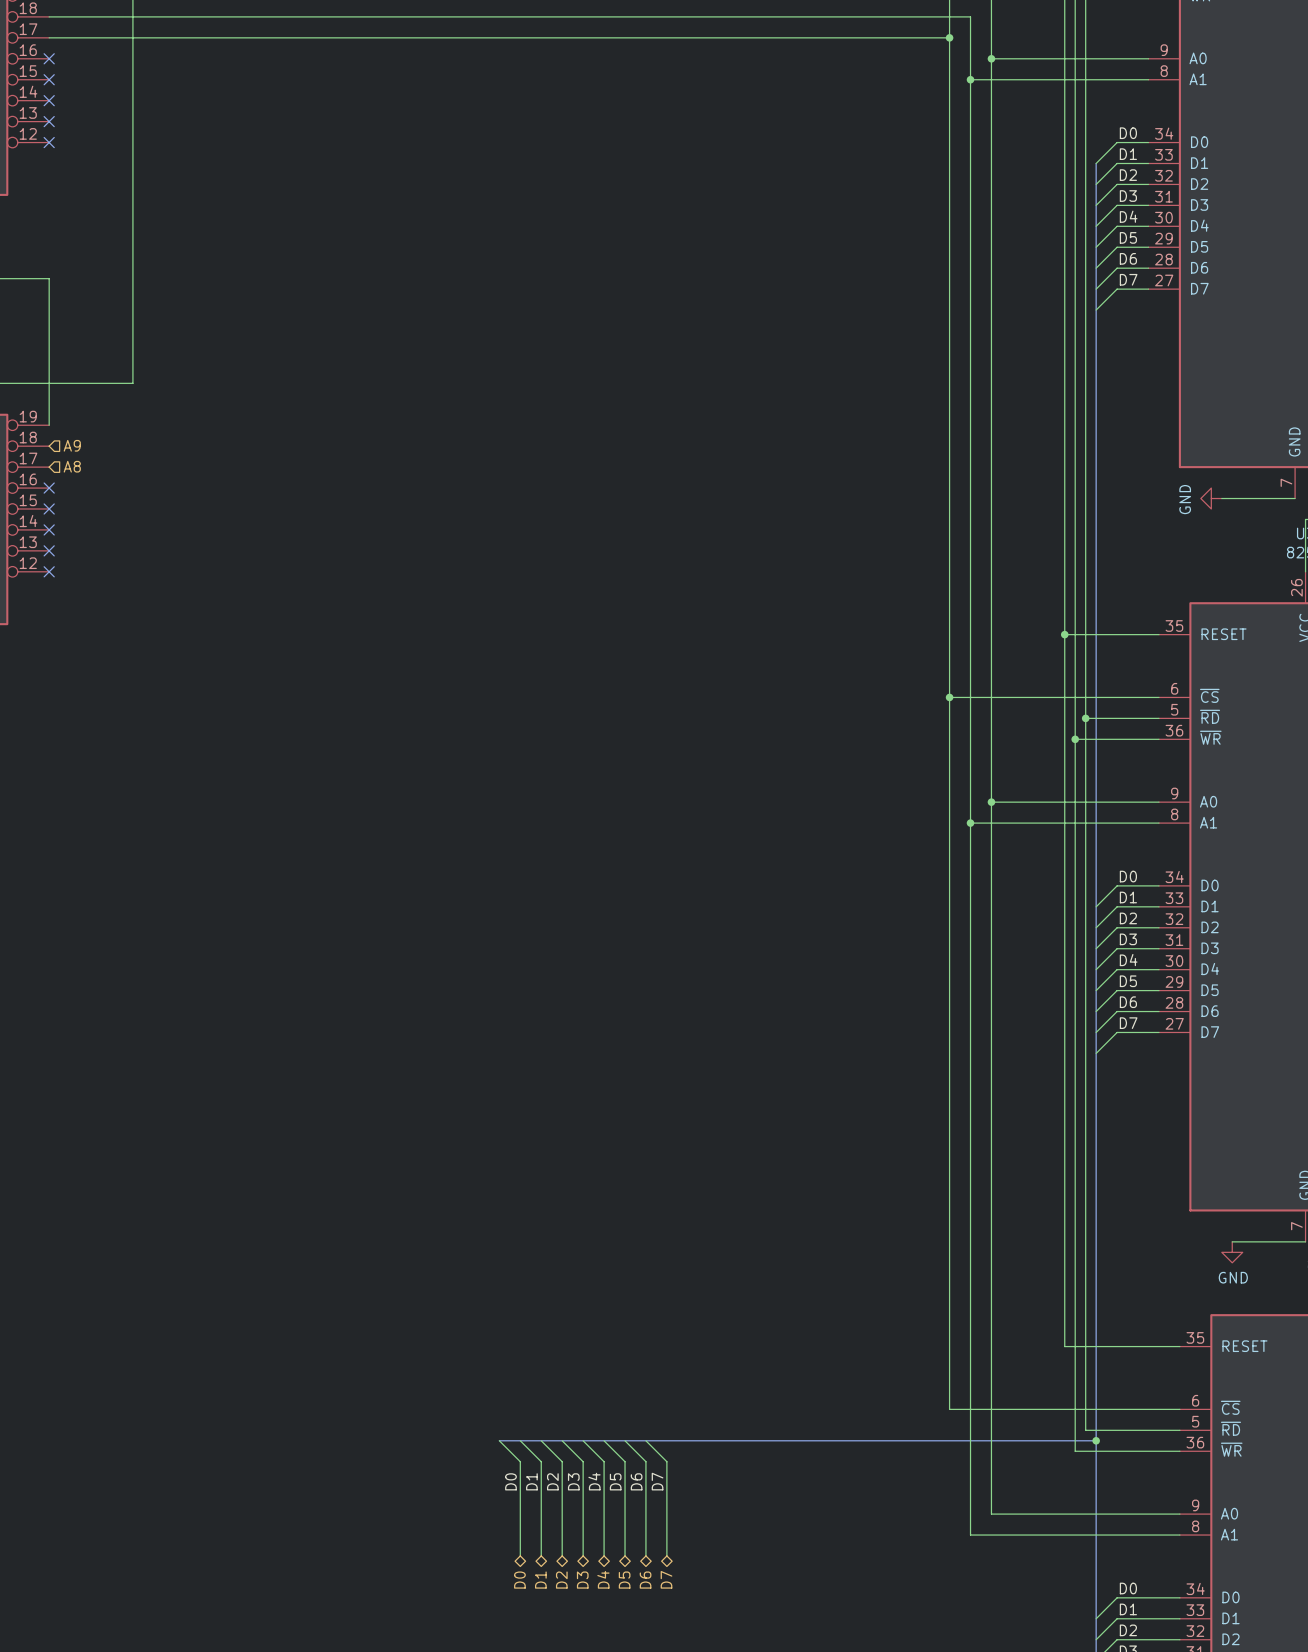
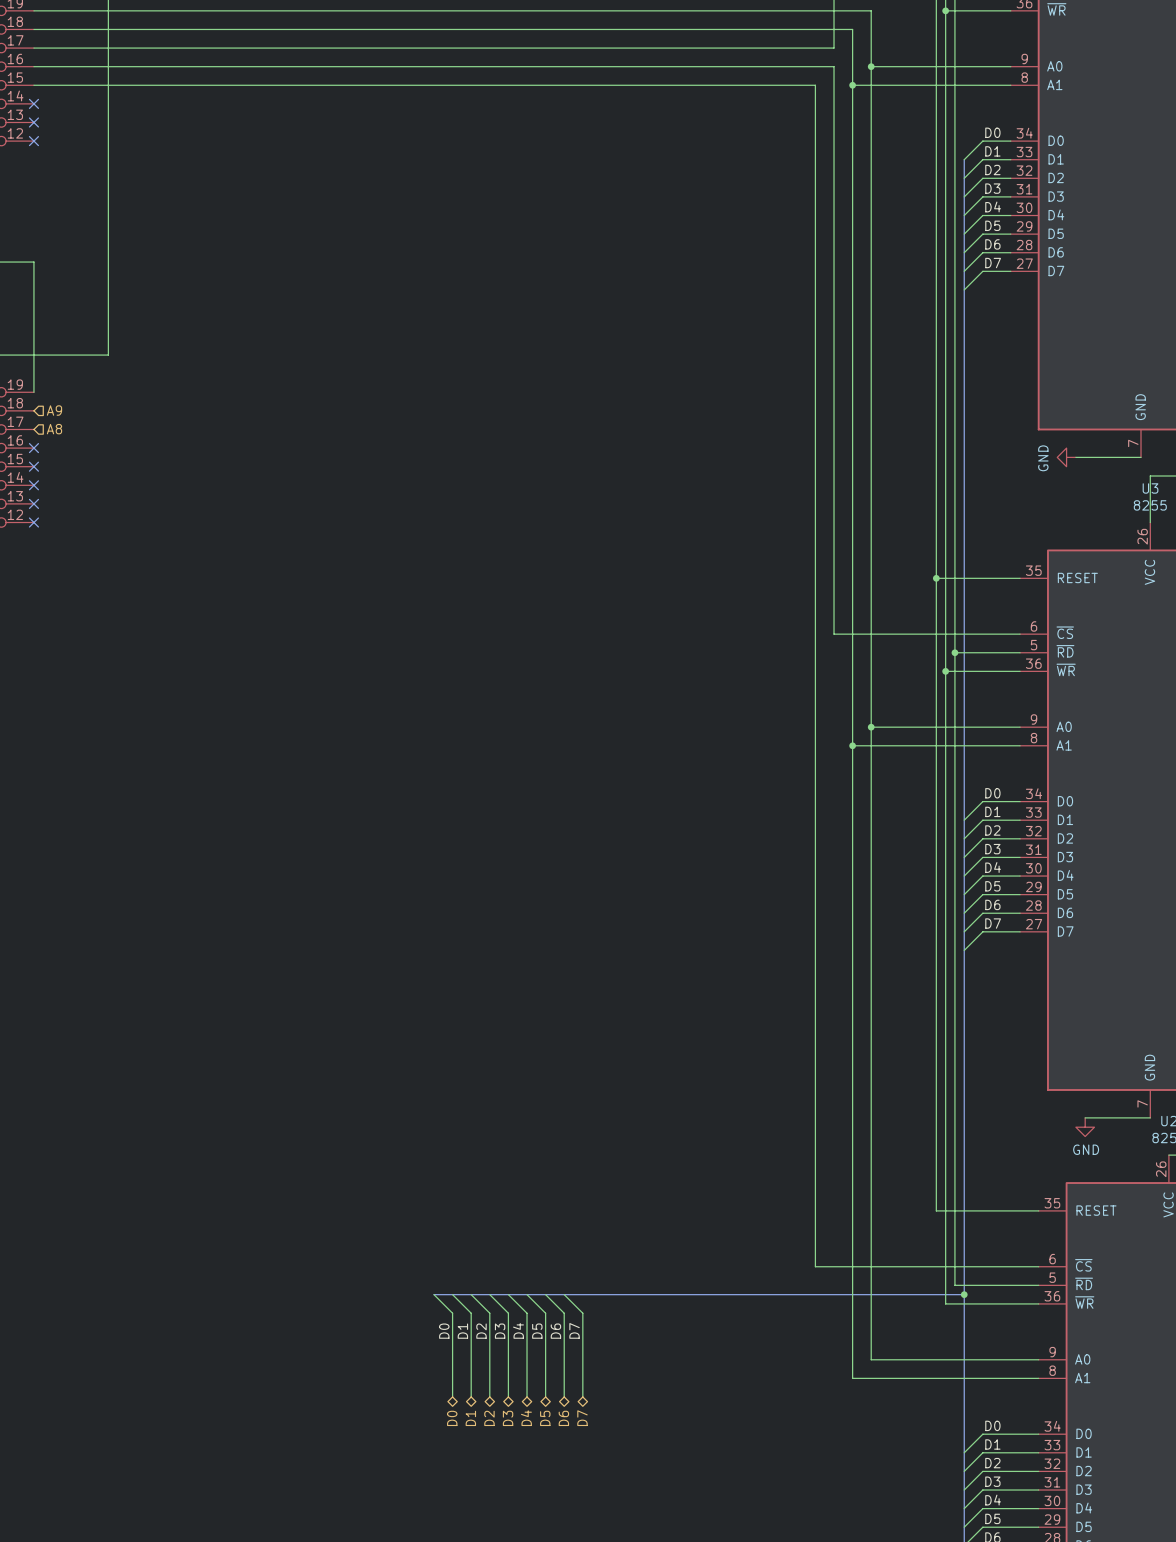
wire: (949, 37) (949, 58) -> (33, 66) (834, 66)
junction: (949, 37) -> none
no-connect mark: (49, 58) -> none
no-connect mark: (49, 79) -> none
wire: (949, 697) (949, 1409) -> (33, 85) (815, 85) (815, 1266) (834, 1266)
junction: (949, 697) -> none

